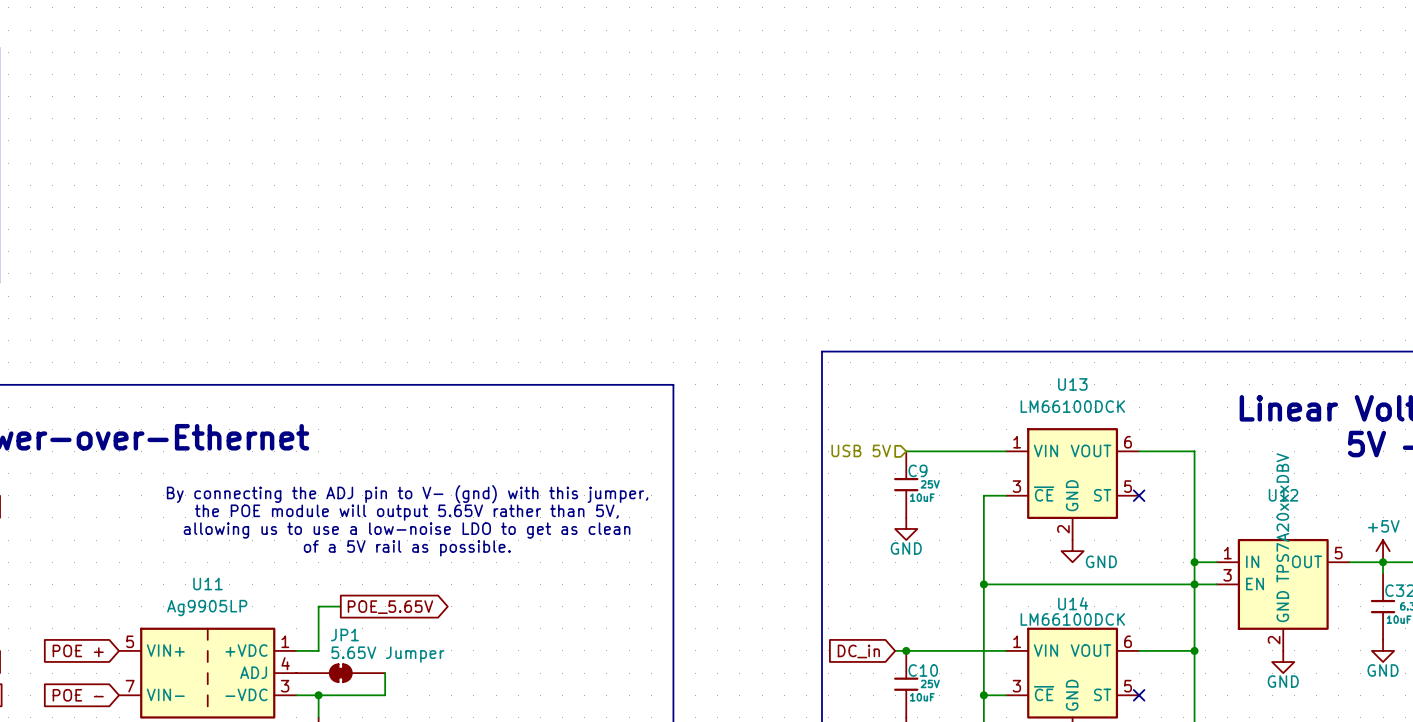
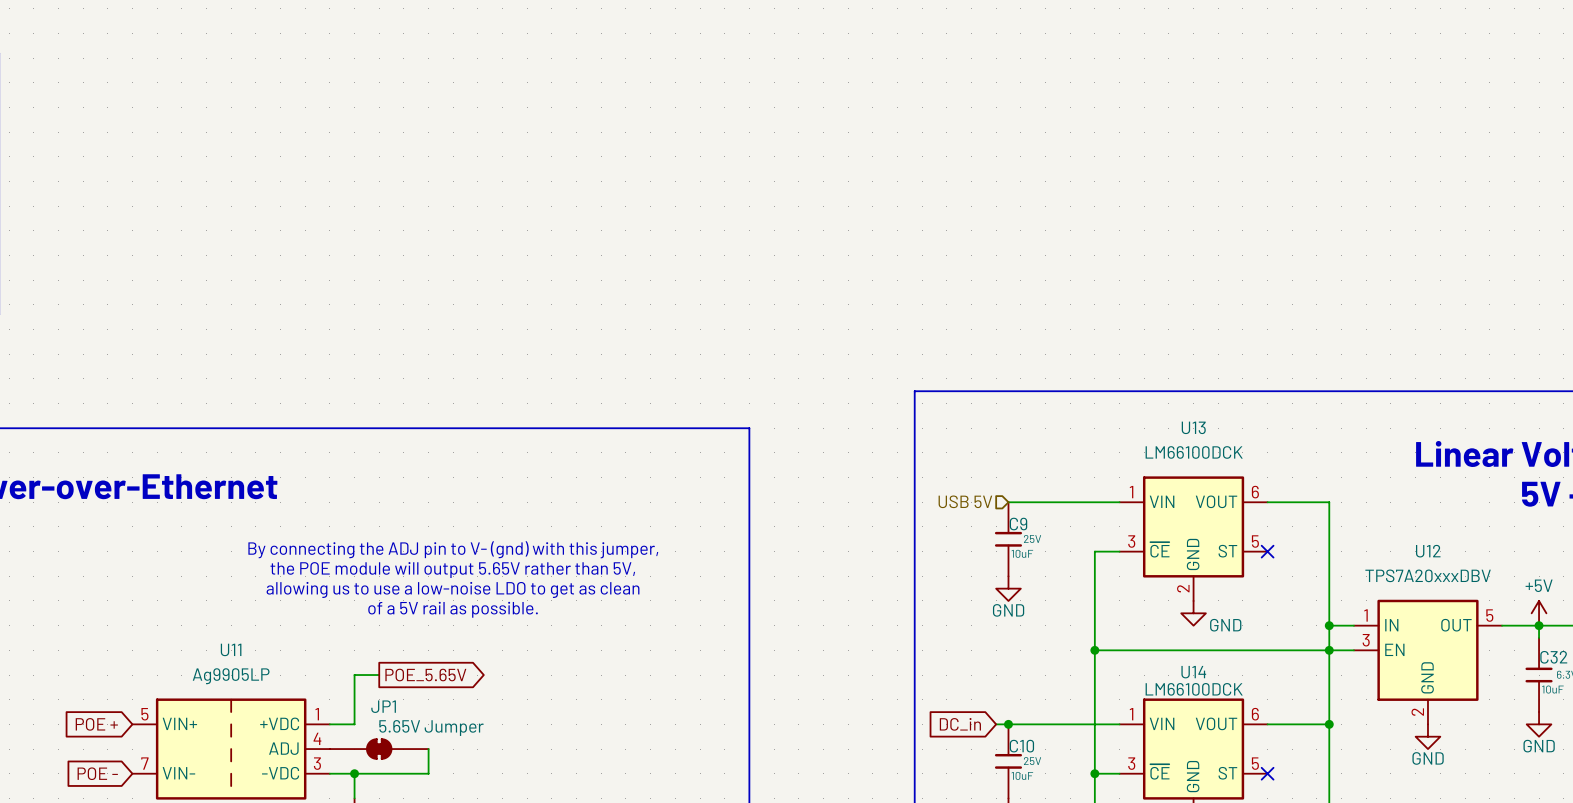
U12 value rotation: 0° (1282, 517) -> 90° clockwise (1428, 575)

